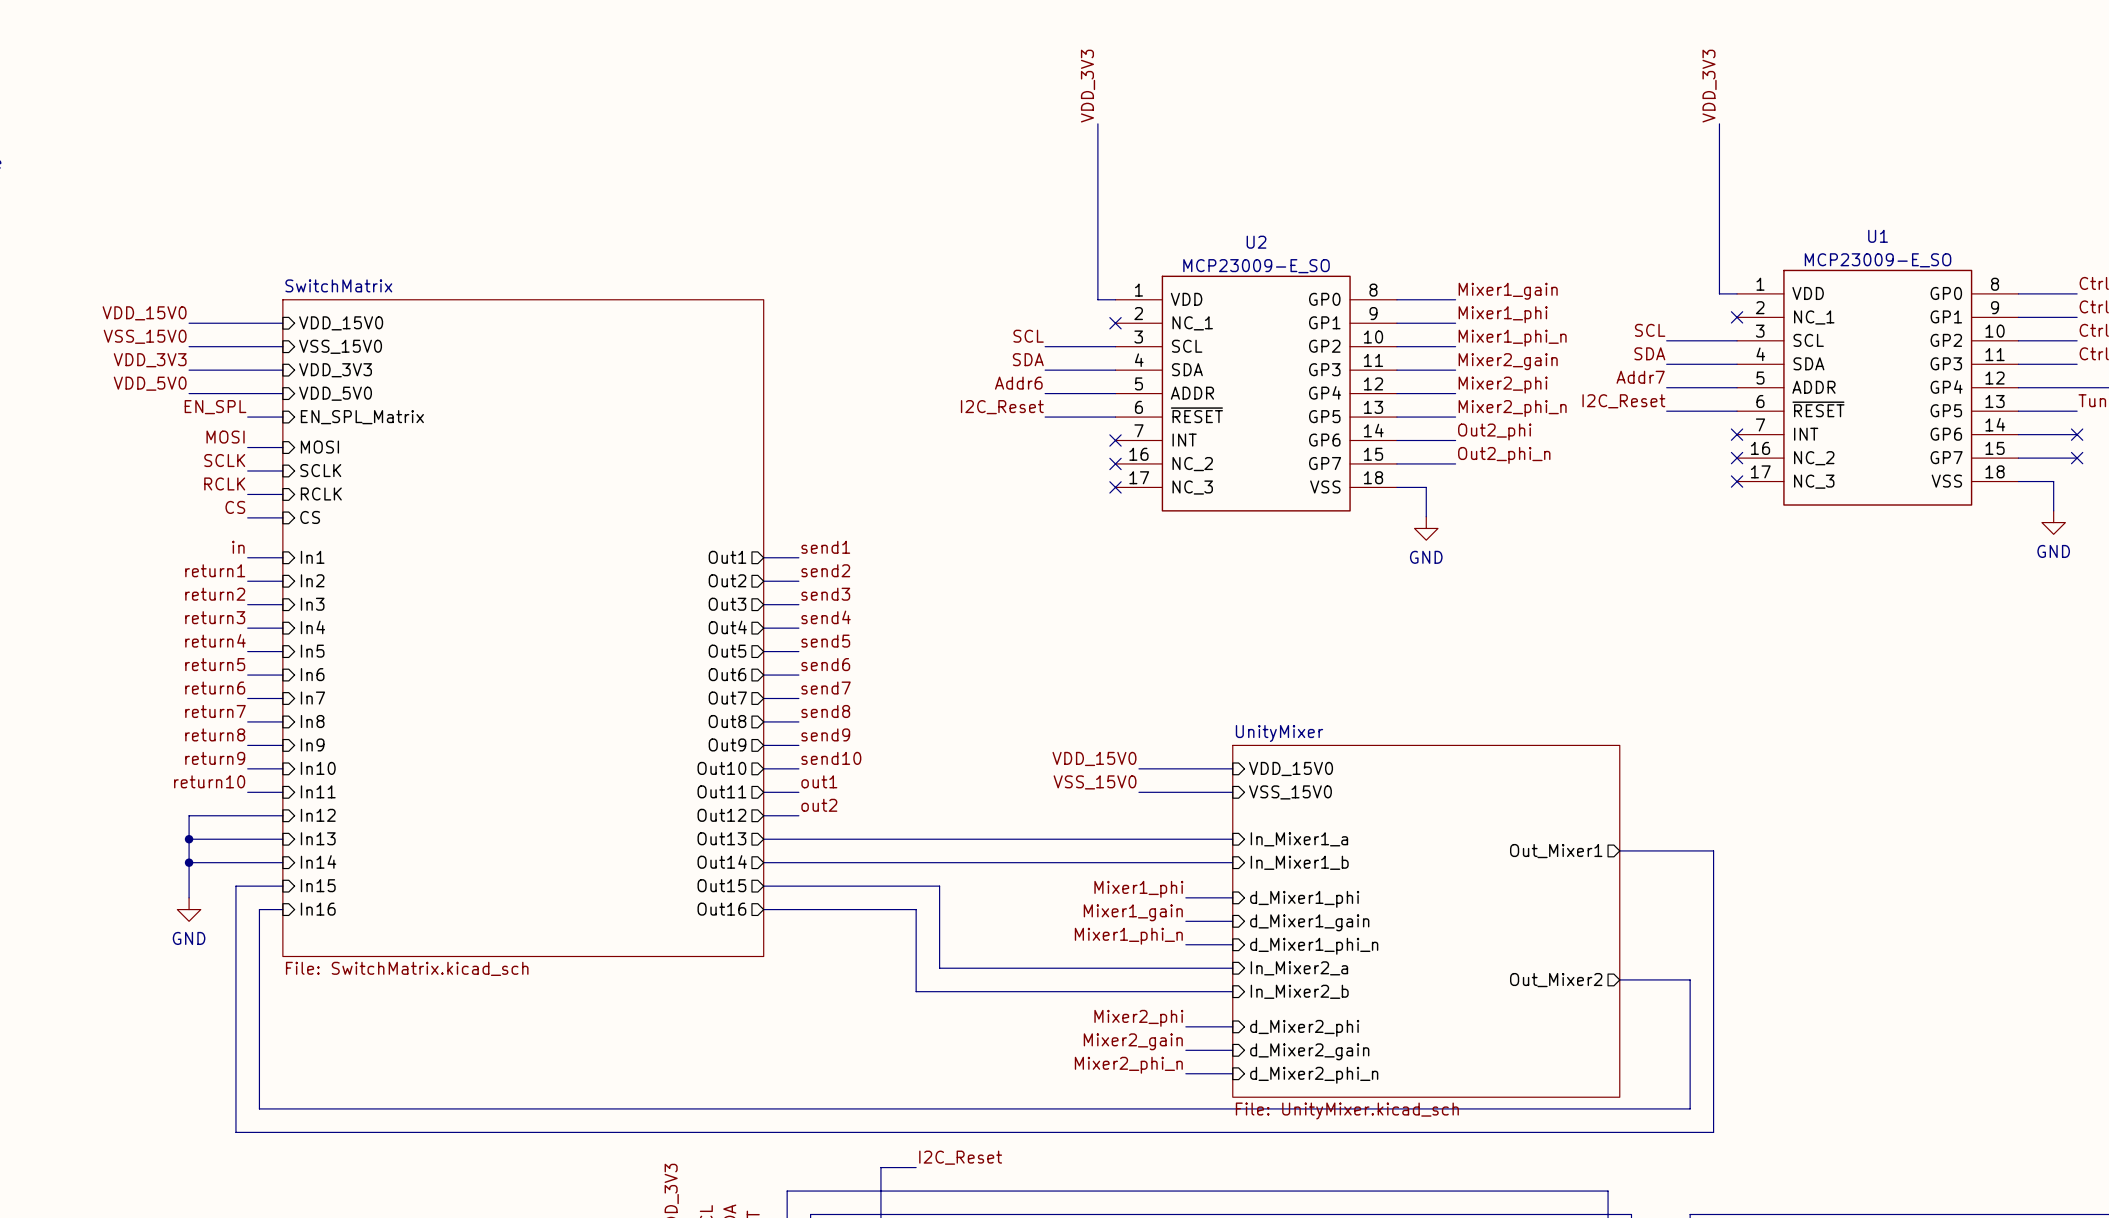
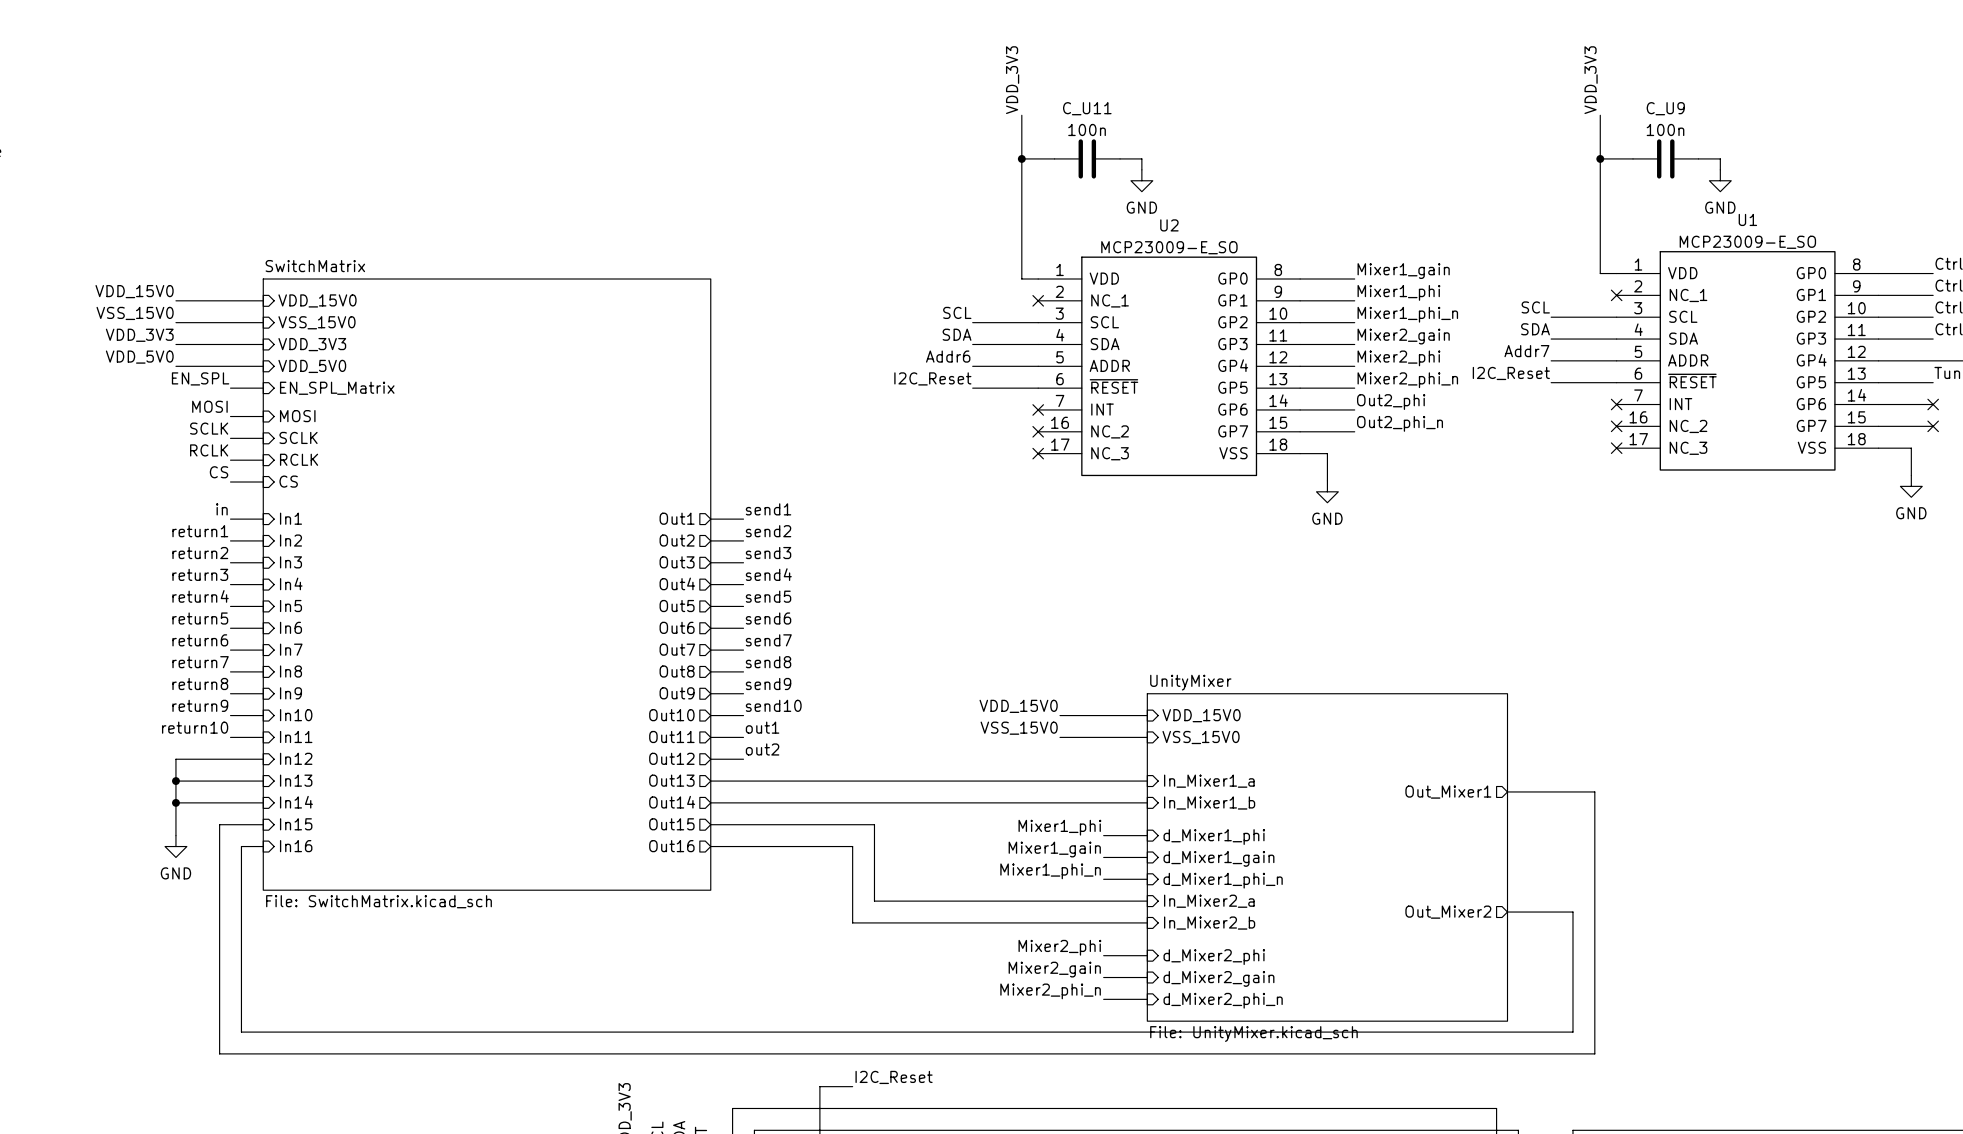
wire: none -> (1021, 158) (1054, 158)
junction: none -> (1021, 158)
C_U11: none -> 100n (1087, 158)
wire: none -> (1120, 158) (1141, 158) (1141, 169)
wire: none -> (1600, 158) (1633, 158)
junction: none -> (1600, 158)
C_U9: none -> 100n (1665, 158)
wire: none -> (1698, 158) (1720, 158) (1720, 169)
power symbol: none -> GND (1141, 180)
power symbol: none -> GND (1720, 180)

